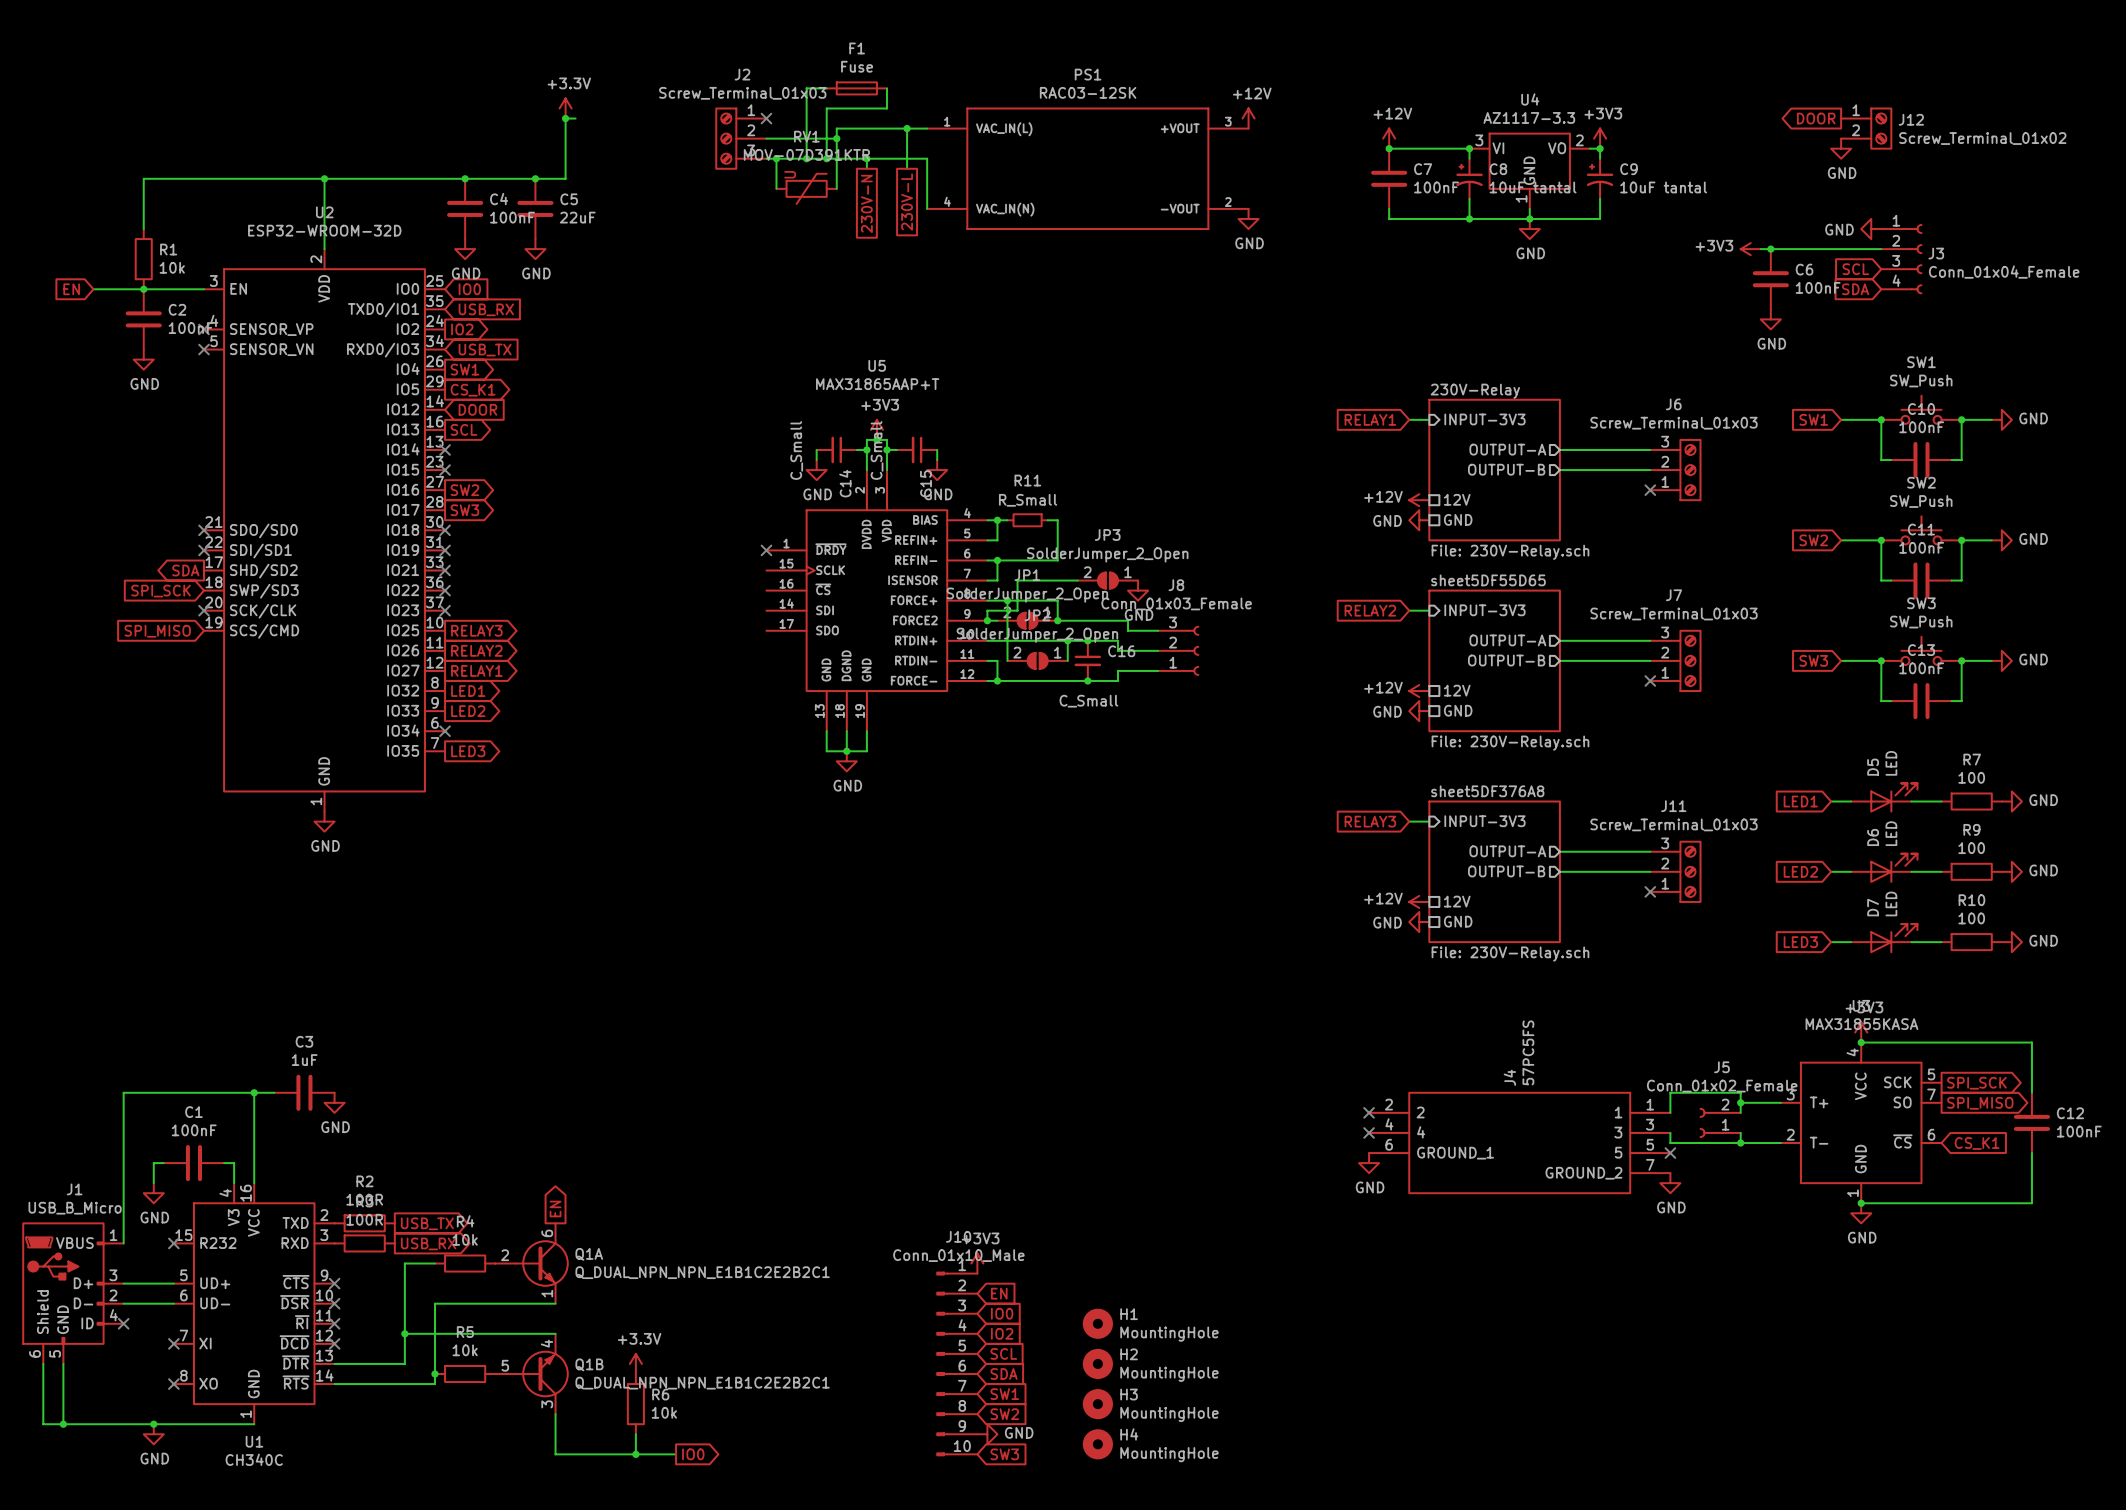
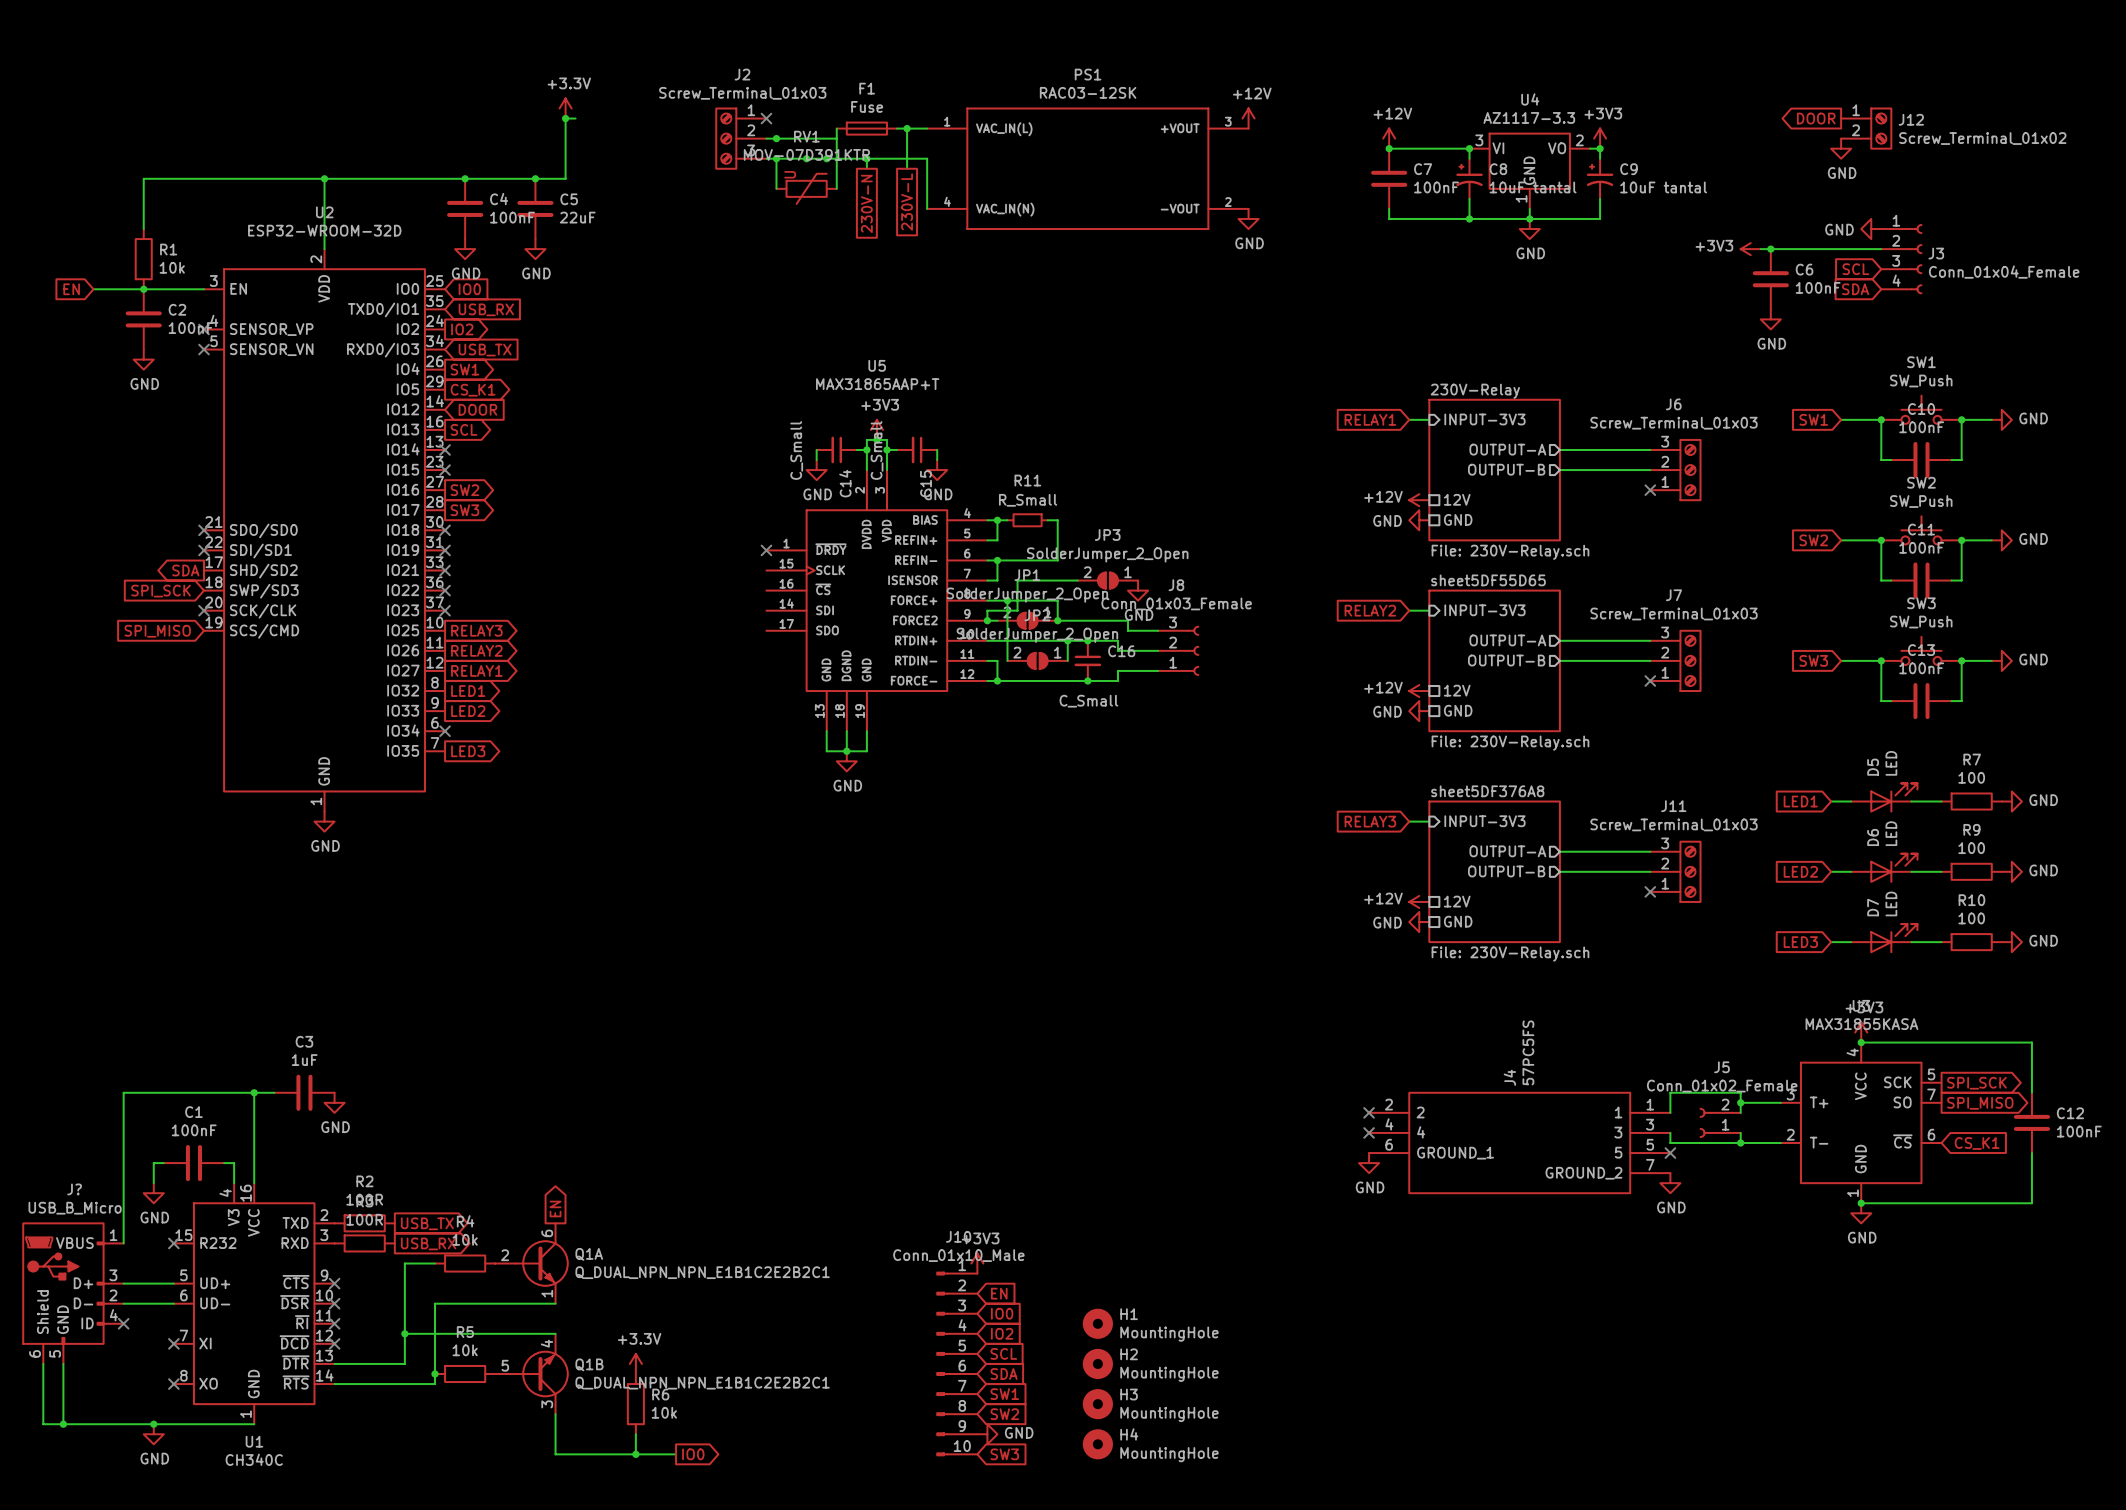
wire: (826, 88) (806, 88) (806, 158) -> none
F1 position: (856, 88) -> (866, 128)
wire: (886, 88) (886, 108) (826, 108) (826, 158) -> none
junction: none -> (776, 138)
junction: (836, 138) -> none
J1 name: J1 (74, 1189) -> J? (74, 1189)

